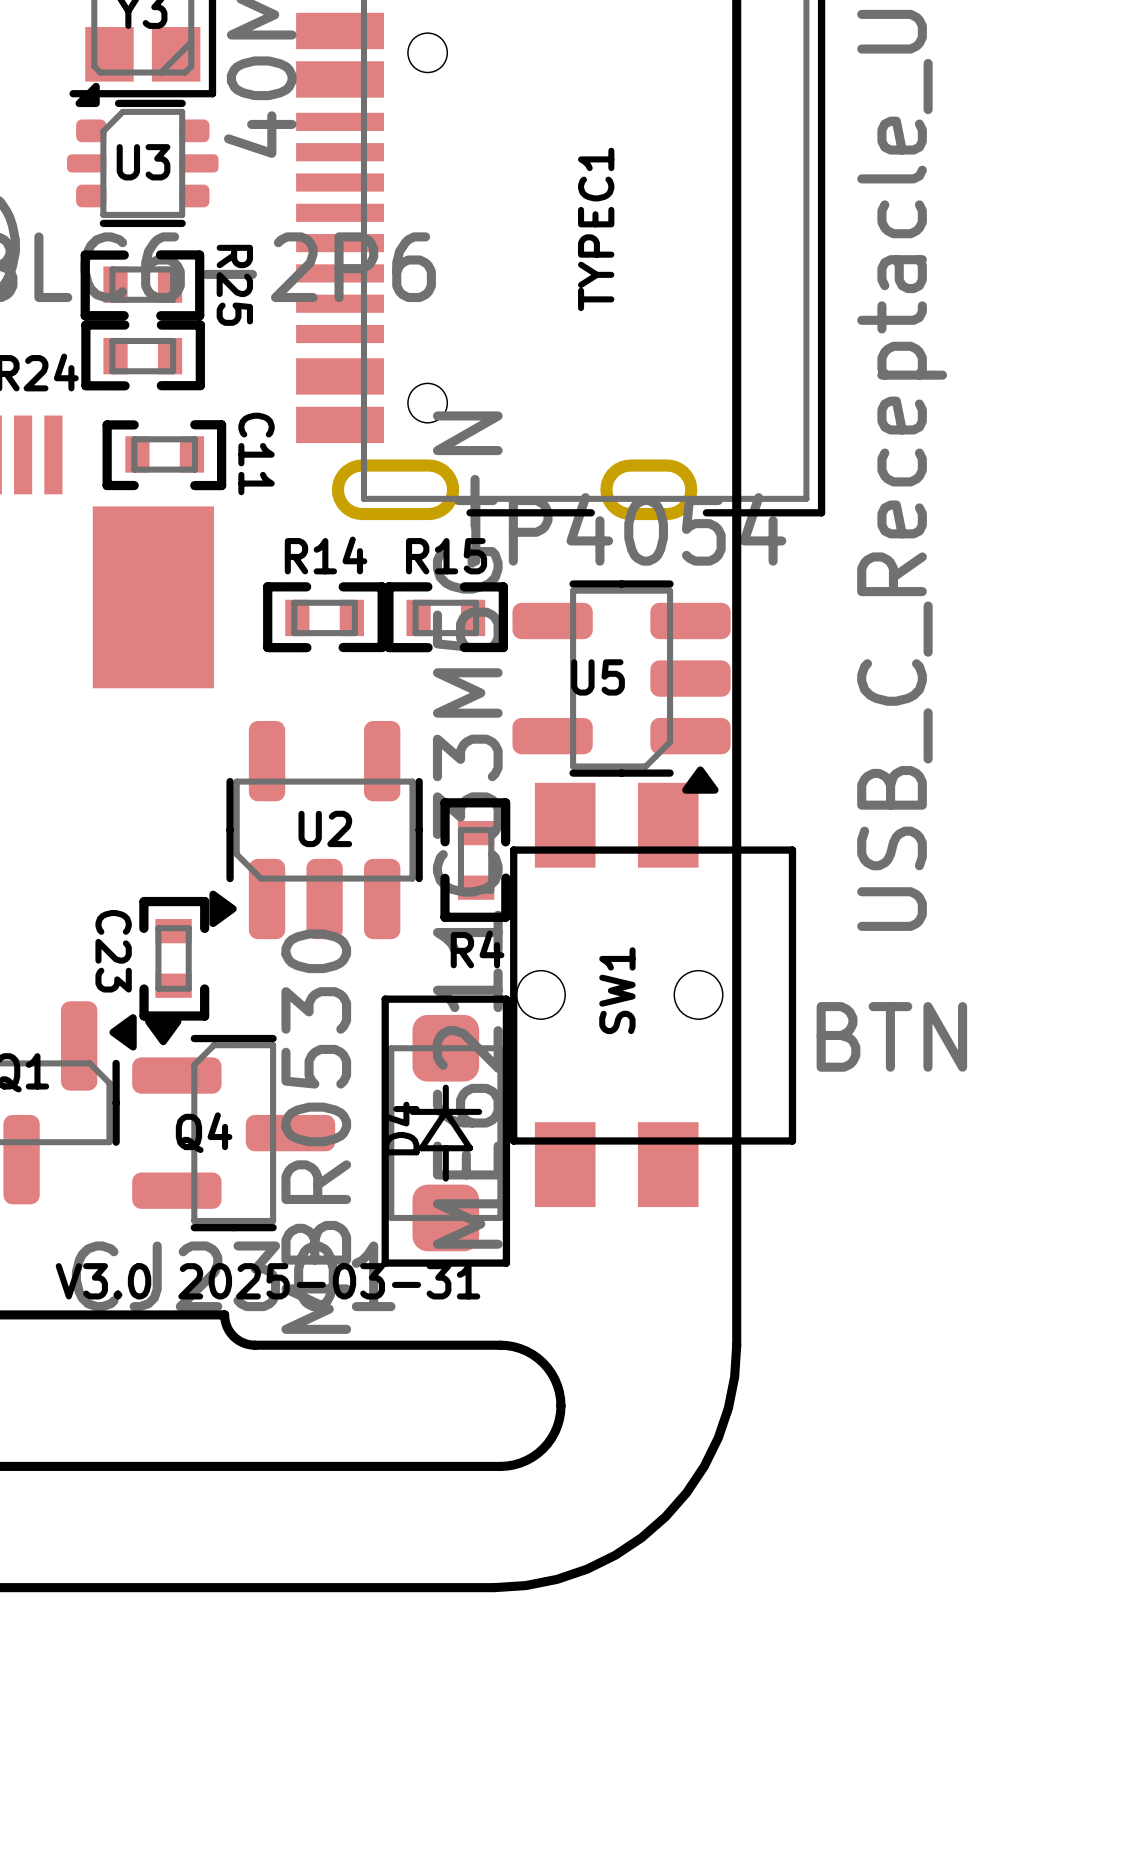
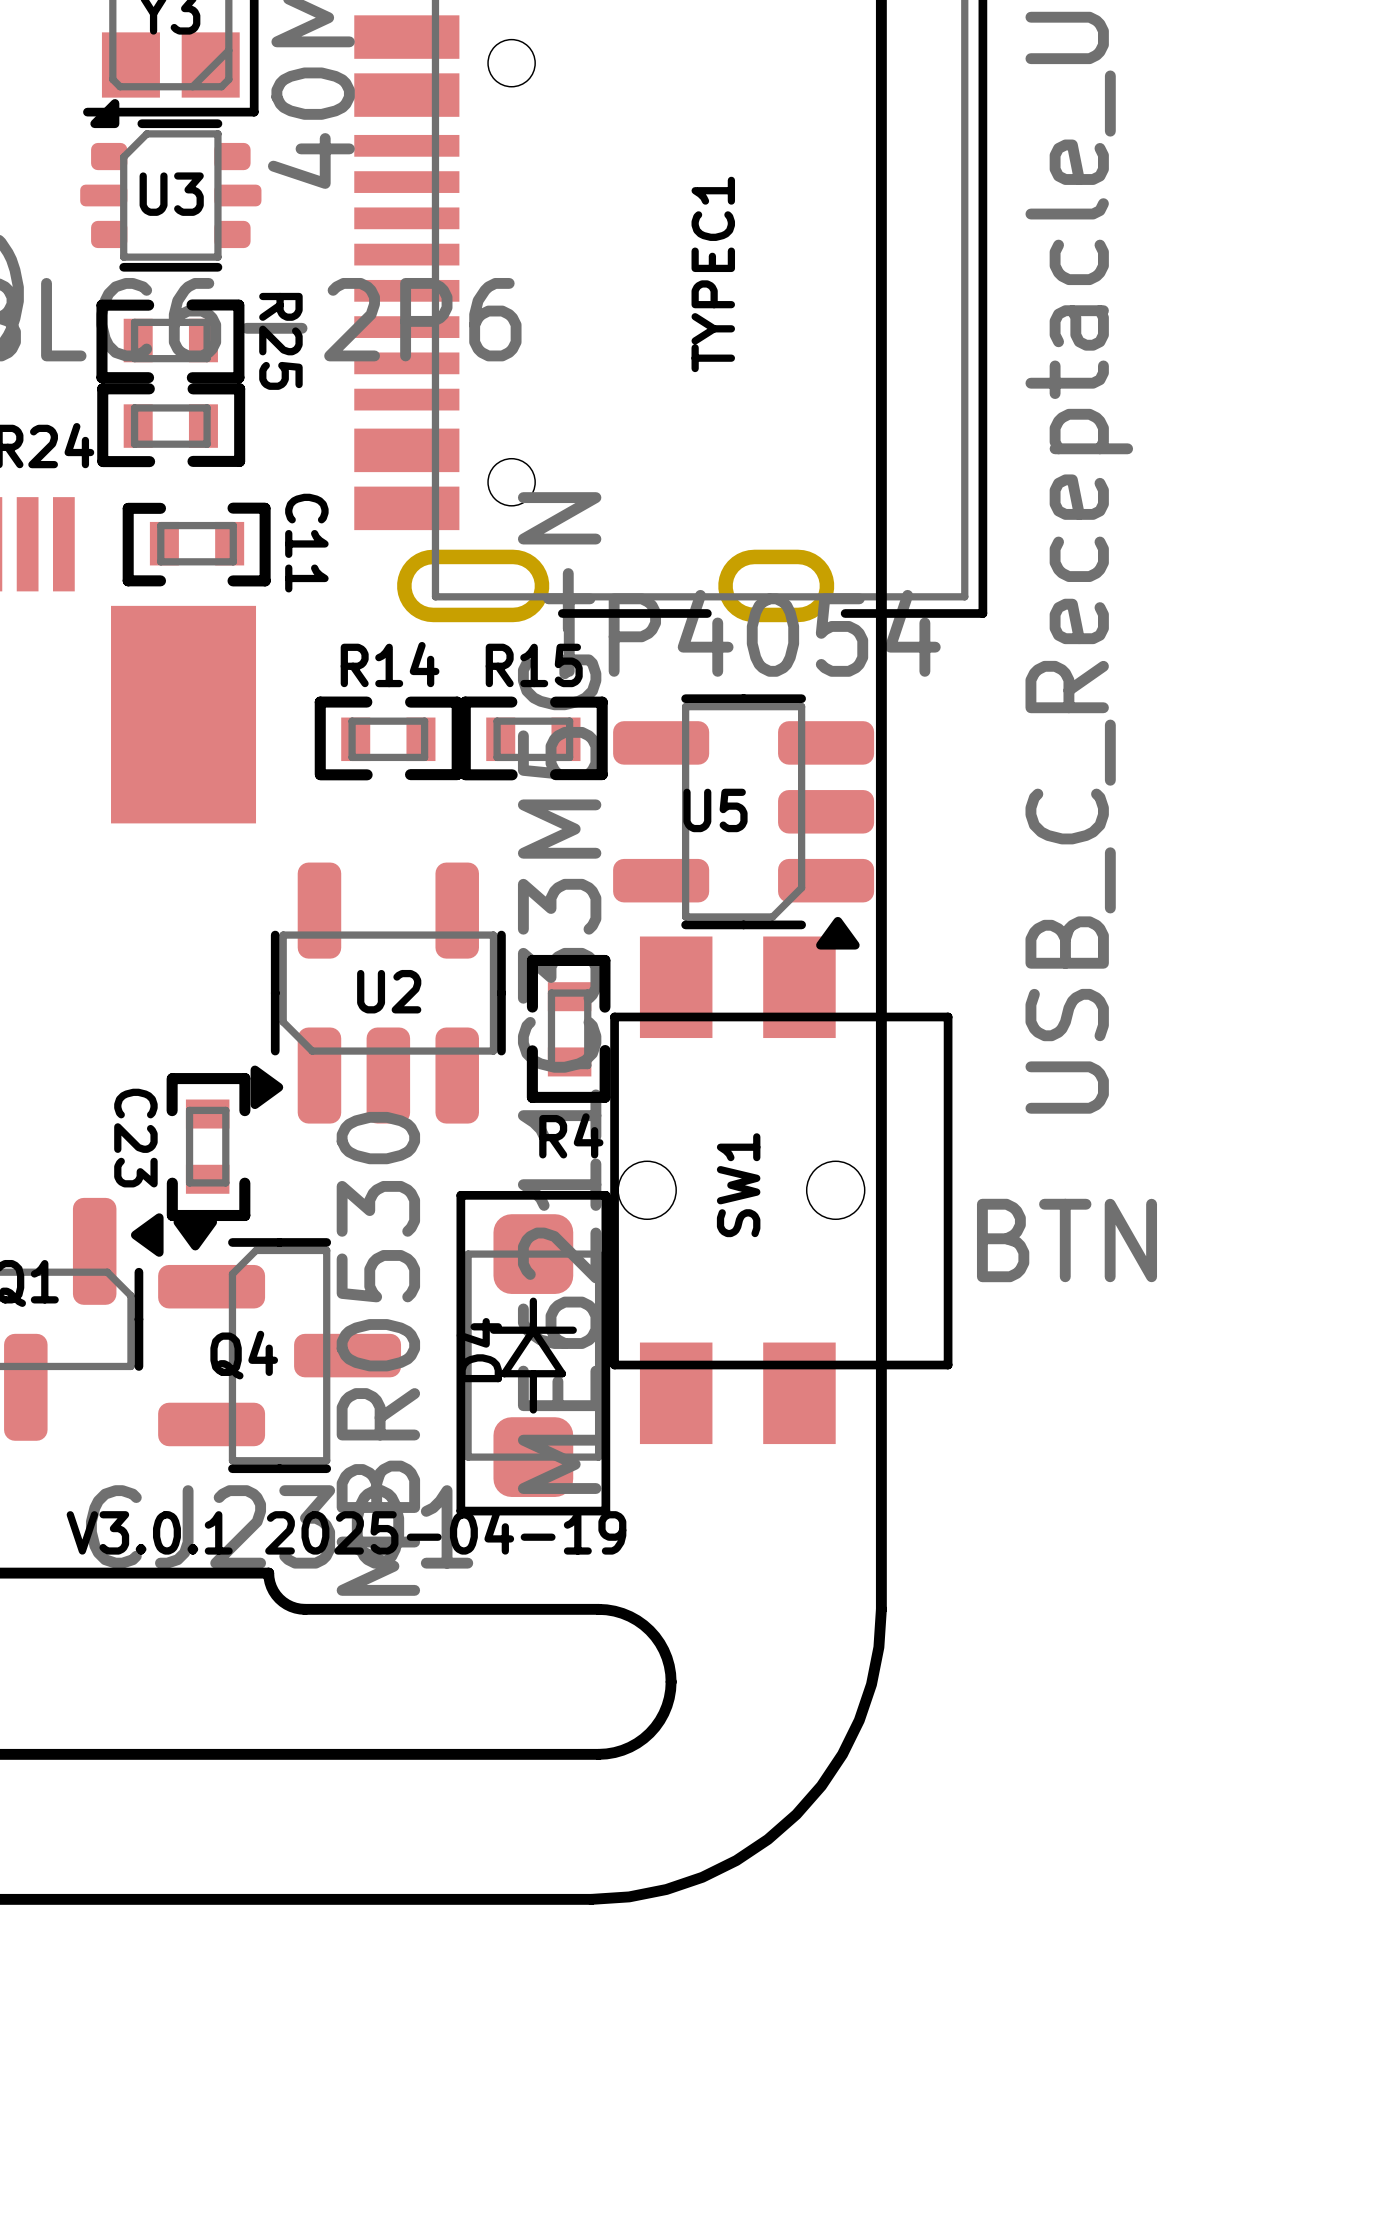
text: V3.0 2025-03-31 (267, 1281) -> V3.0.1 2025-04-19 (346, 1532)

